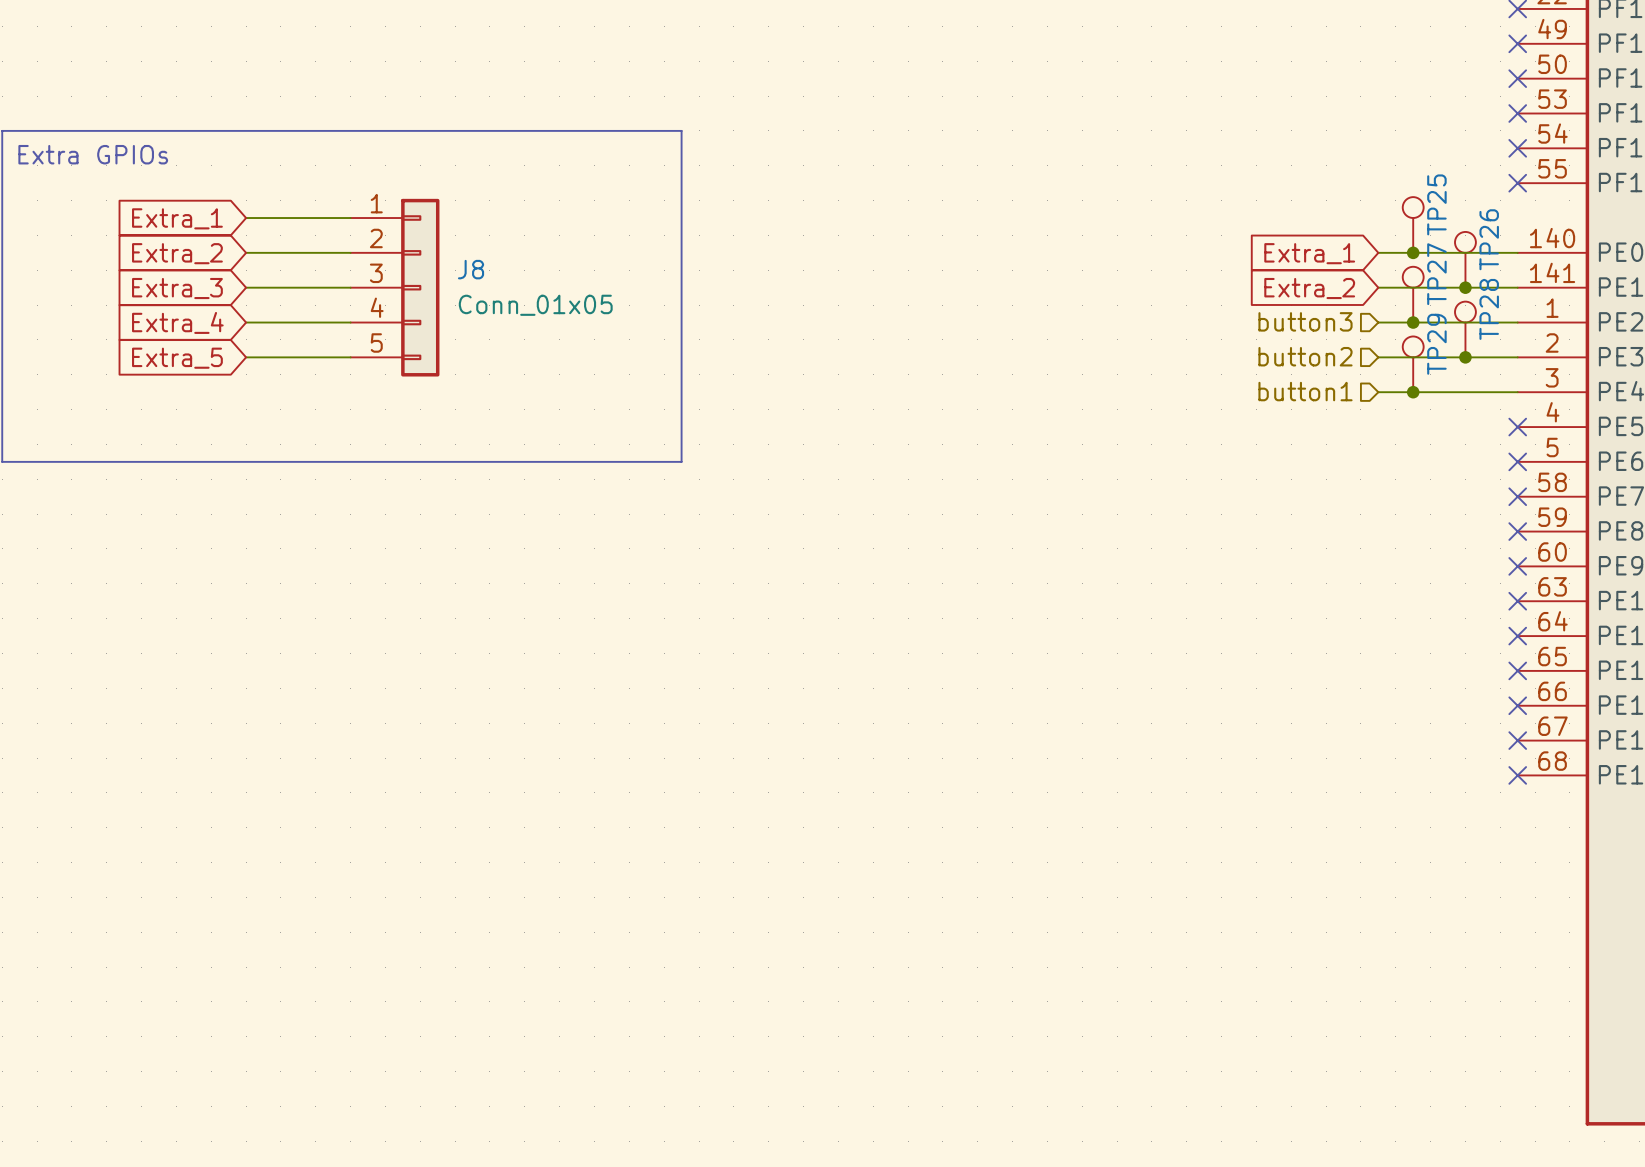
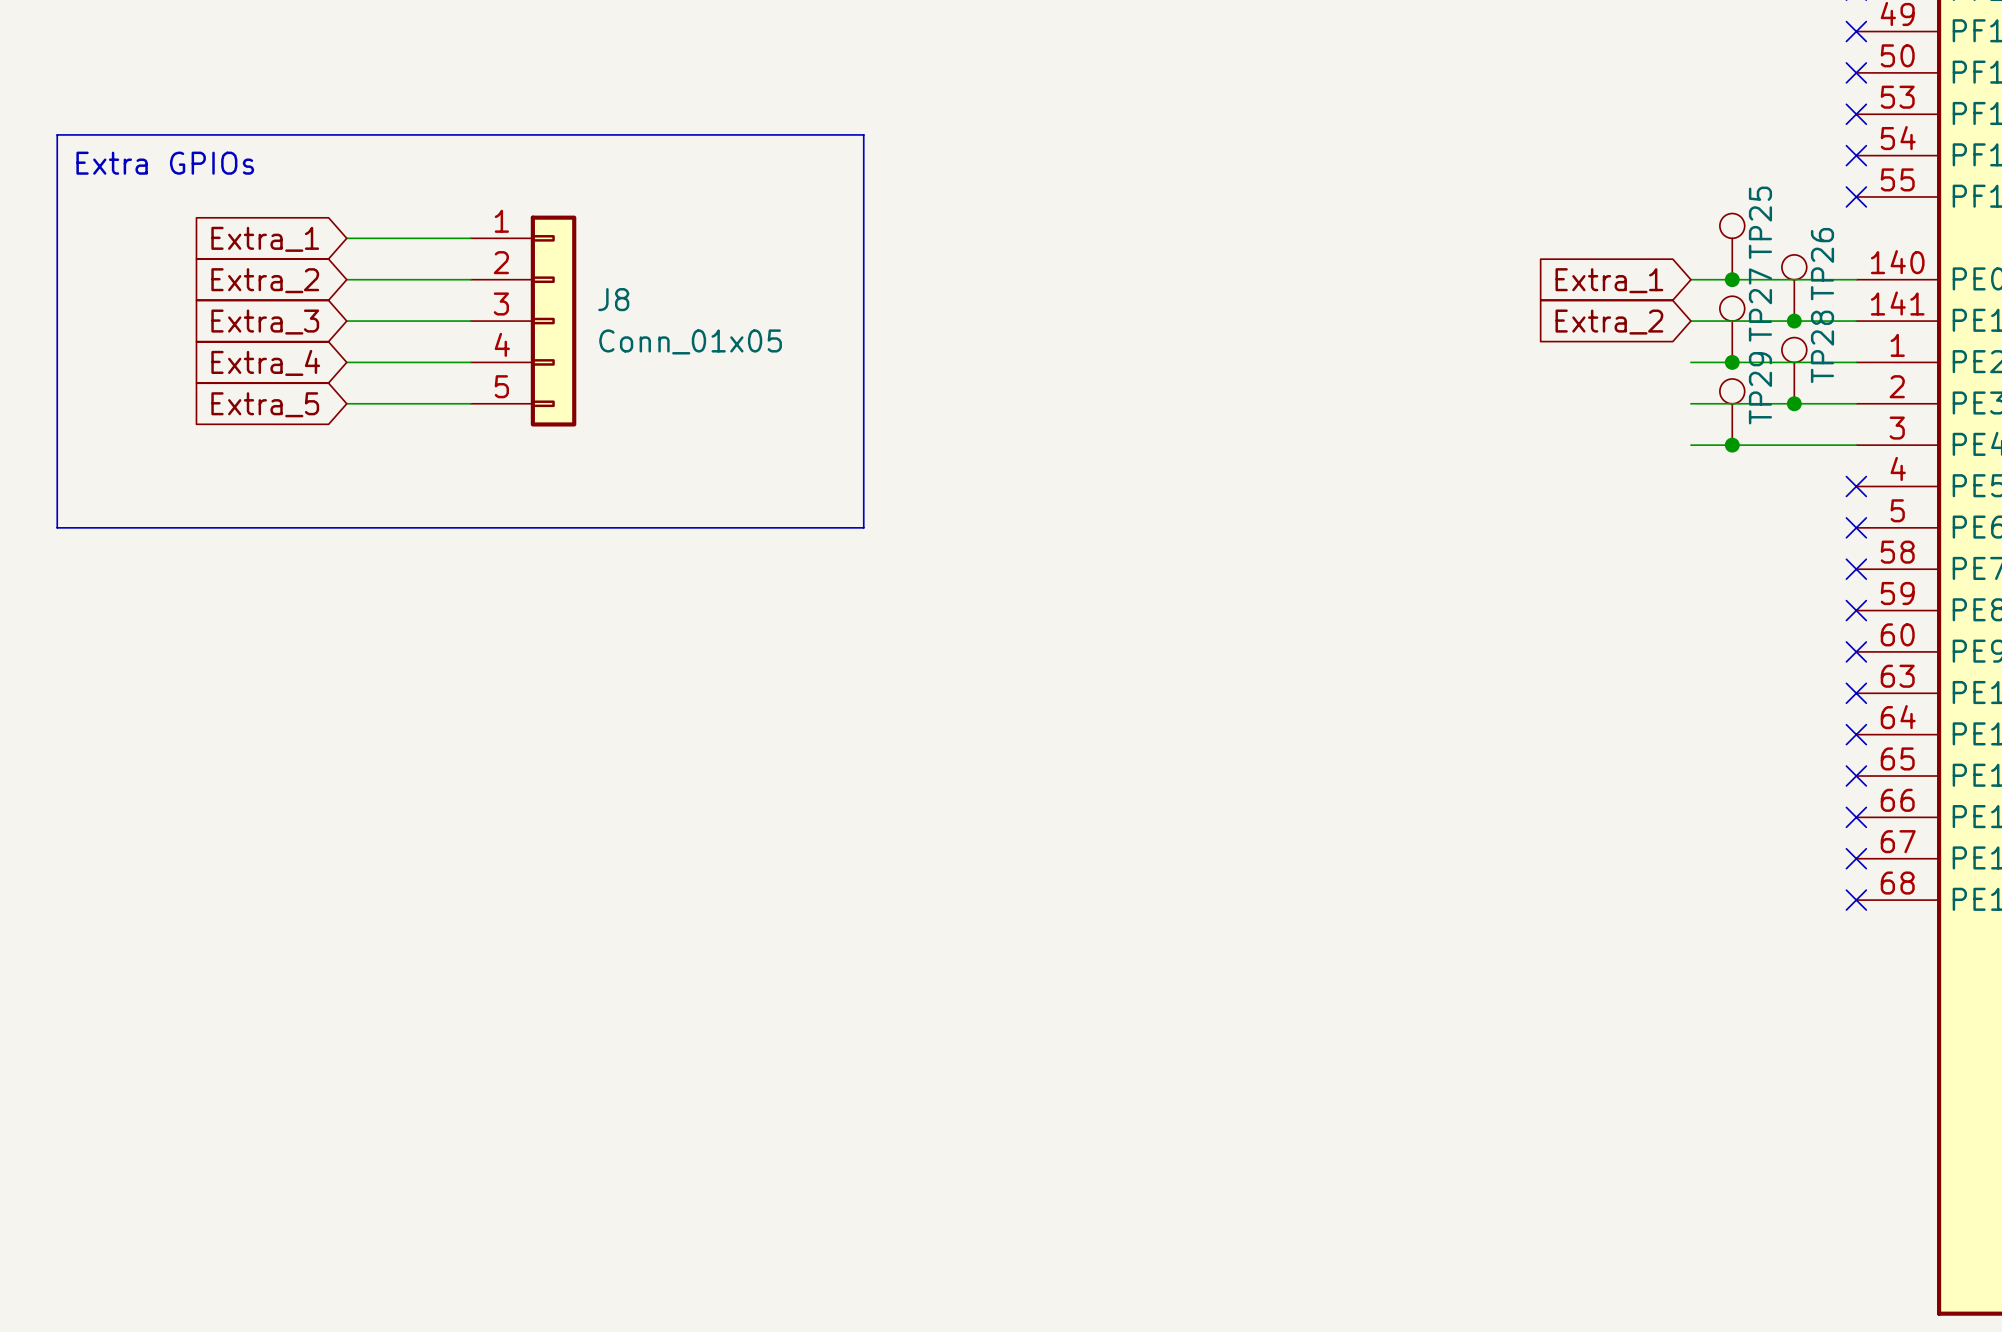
hierarchical label: button3 (1305, 321) -> none
hierarchical label: button2 (1305, 356) -> none
hierarchical label: button1 (1305, 391) -> none

